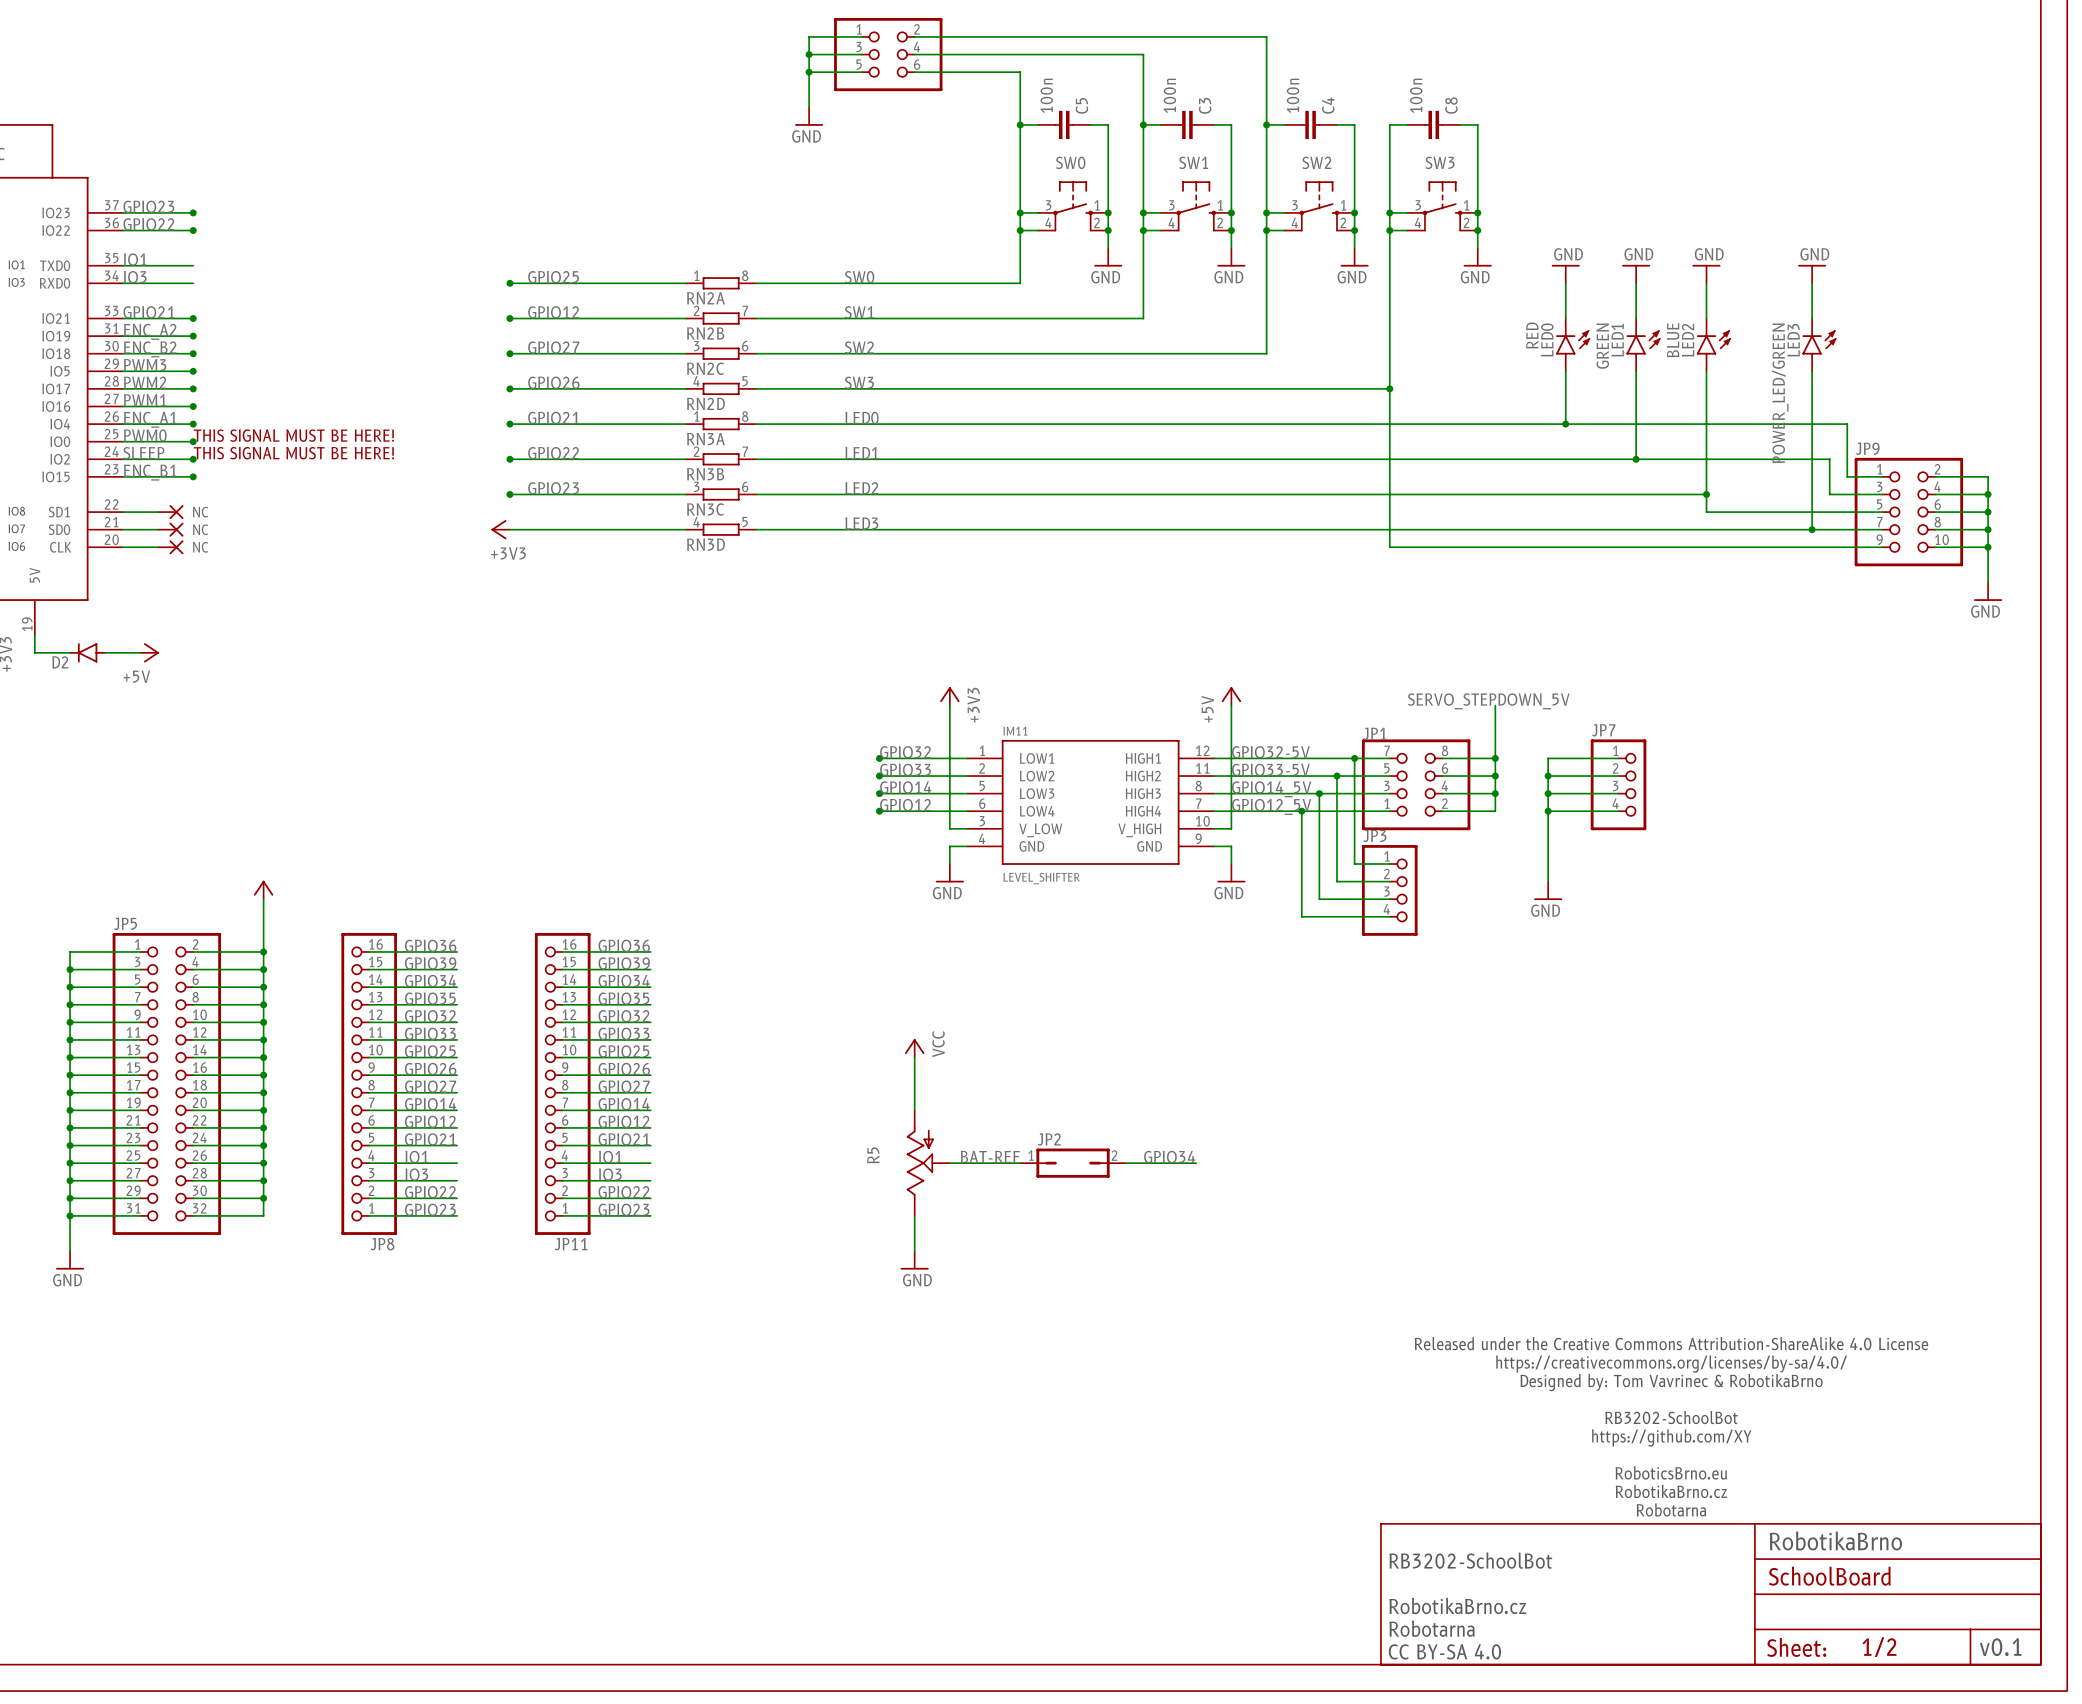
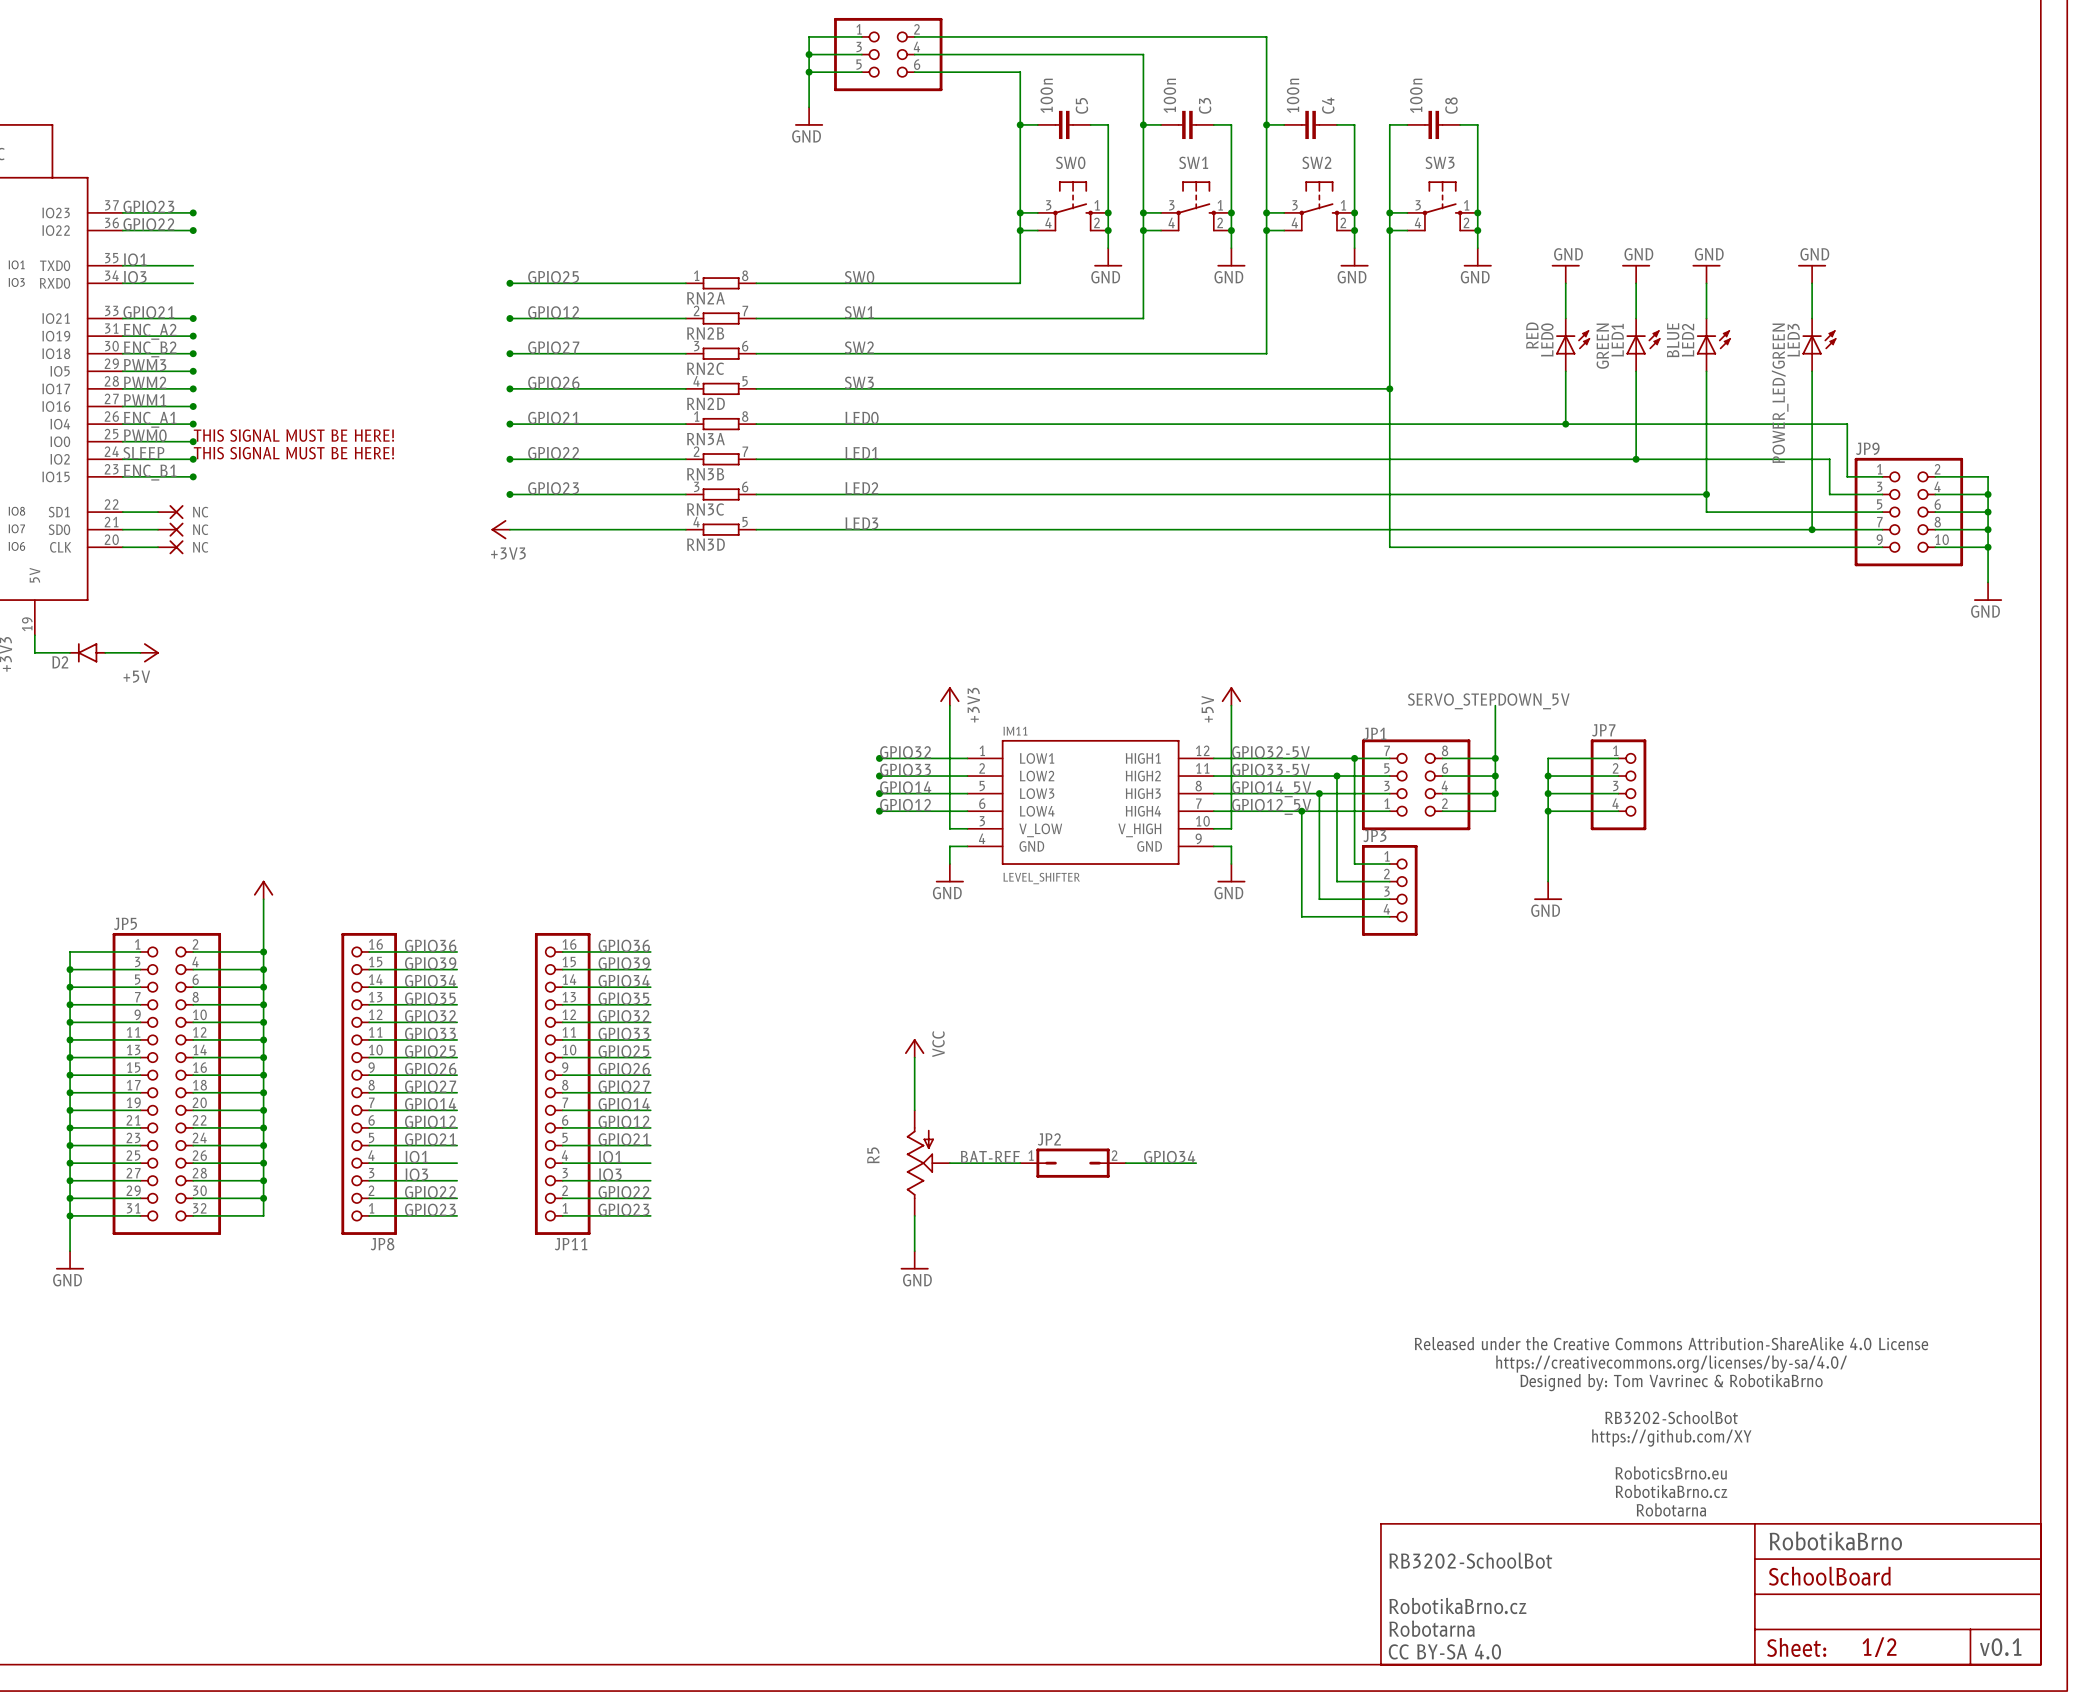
LED0 symbol: [1556, 318, 1591, 372] -> [1556, 318, 1591, 372]
LED1 symbol: [1626, 318, 1661, 372] -> [1626, 318, 1661, 372]
LED2 symbol: [1696, 318, 1731, 372] -> [1696, 318, 1731, 372]
LED3 symbol: [1802, 318, 1837, 372] -> [1802, 318, 1837, 372]

